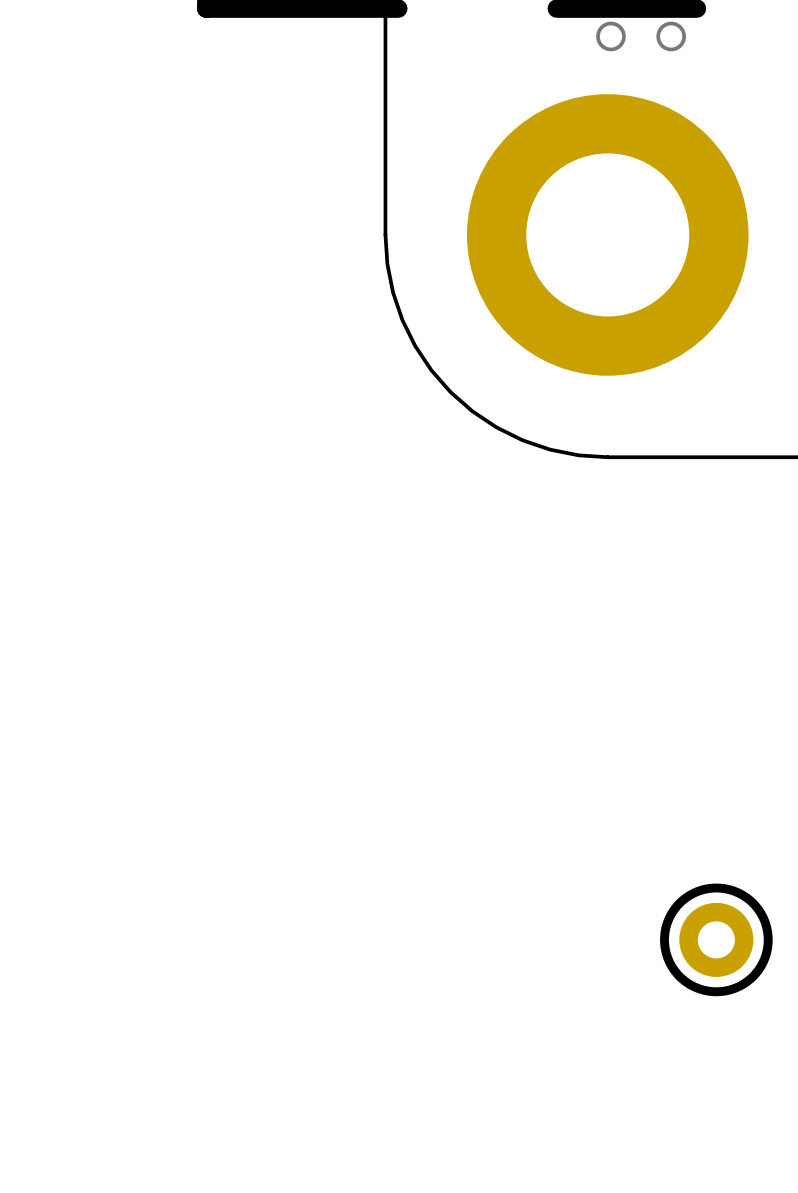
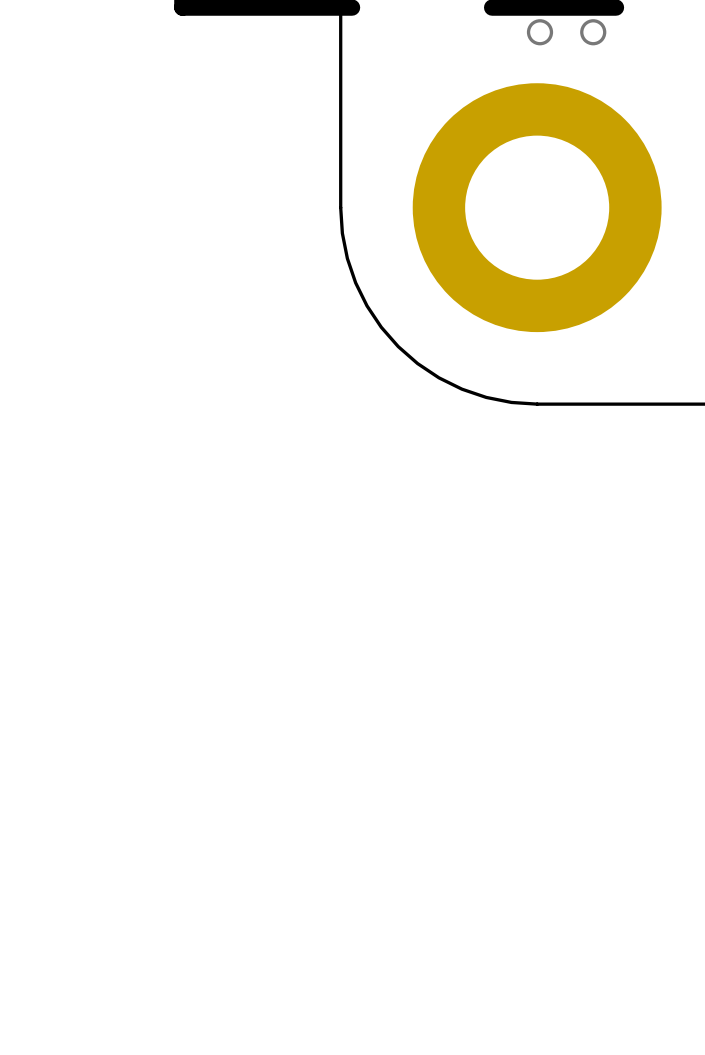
part: (716, 939) -> none

